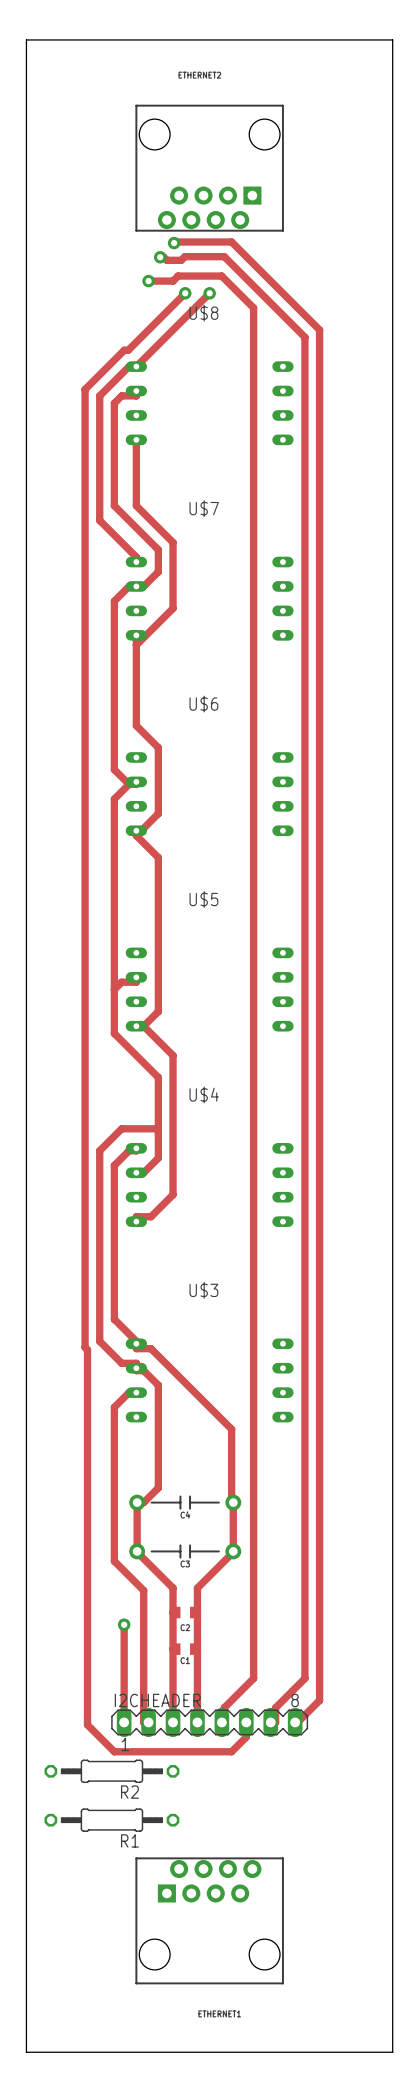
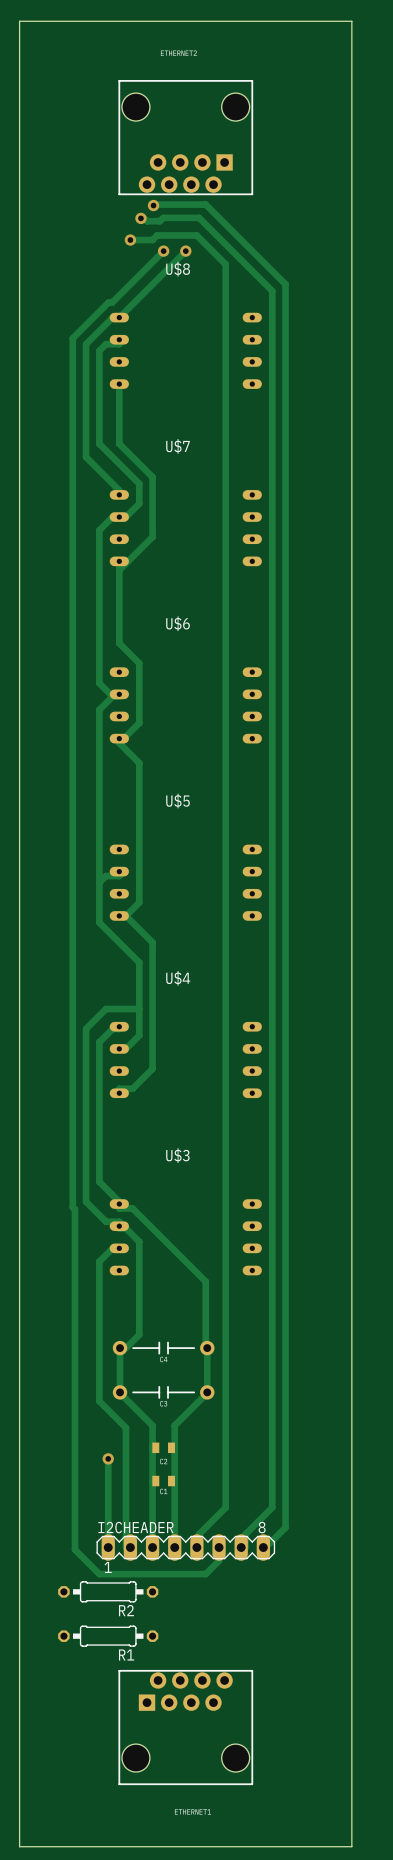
R2 footprint: [44, 1759, 180, 1784] -> [58, 1581, 159, 1603]
R1 footprint: [44, 1808, 180, 1832] -> [58, 1625, 159, 1647]

